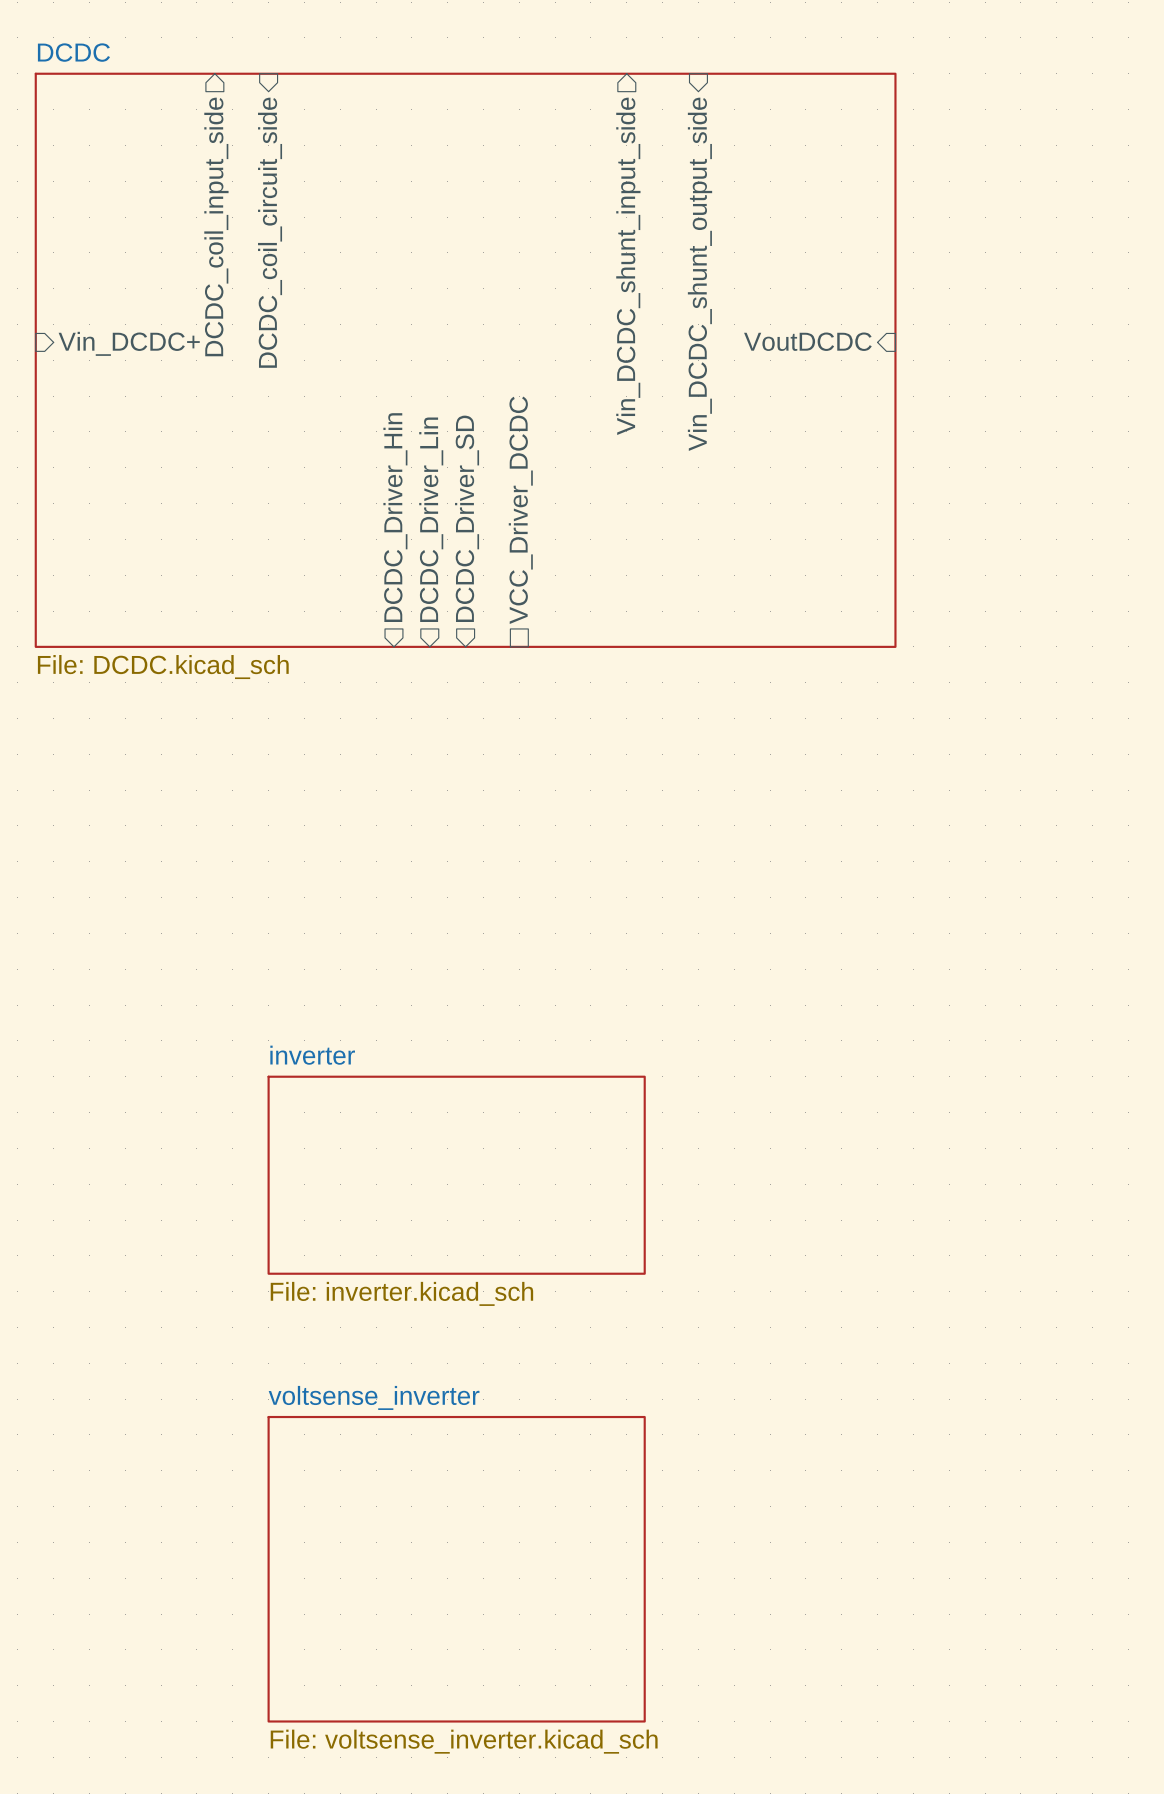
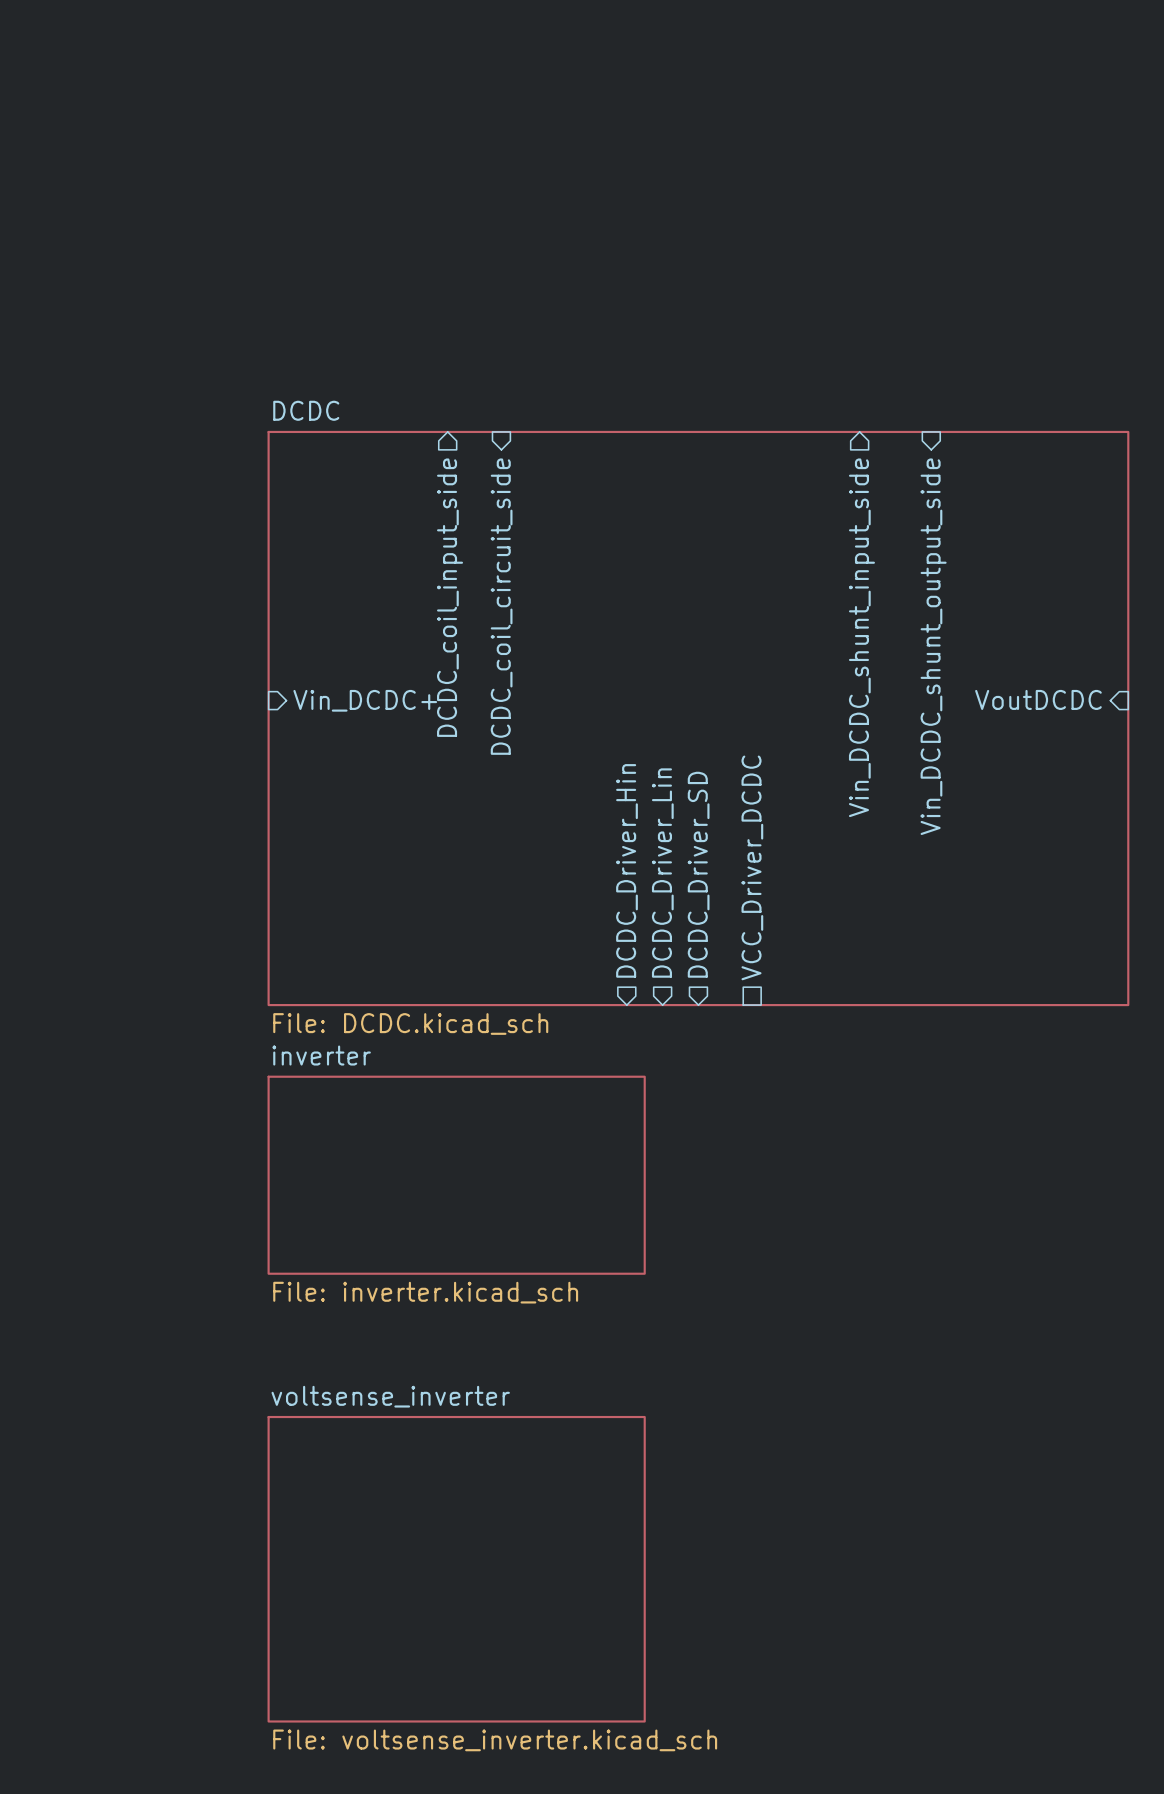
sheet pin: DCDC_coil_input_side (216, 226) -> none
sheet pin: DCDC_coil_circuit_side (270, 232) -> none
sheet pin: Vin_DCDC_shunt_input_side (628, 266) -> none
sheet pin: Vin_DCDC_shunt_output_side (700, 274) -> none
sheet pin: VoutDCDC (807, 341) -> none
sheet pin: Vin_DCDC+ (129, 343) -> none
sheet DCDC: File: DCDC.kicad_sch (465, 360) -> none
sheet pin: VCC_Driver_DCDC (520, 510) -> none
sheet pin: DCDC_Driver_Hin (395, 517) -> none
sheet pin: DCDC_Driver_SD (467, 518) -> none
sheet pin: DCDC_Driver_Lin (431, 519) -> none
sheet pin: none -> DCDC_coil_input_side (450, 597)
sheet pin: none -> DCDC_coil_circuit_side (501, 606)
sheet pin: none -> Vin_DCDC_shunt_input_side (861, 637)
sheet pin: none -> Vin_DCDC_shunt_output_side (933, 646)
sheet pin: none -> VoutDCDC (1038, 699)
sheet pin: none -> Vin_DCDC+ (365, 700)
sheet DCDC: none -> File: DCDC.kicad_sch (698, 718)
sheet pin: none -> VCC_Driver_DCDC (752, 867)
sheet pin: none -> DCDC_Driver_Hin (626, 870)
sheet pin: none -> DCDC_Driver_Lin (662, 873)
sheet pin: none -> DCDC_Driver_SD (698, 874)

